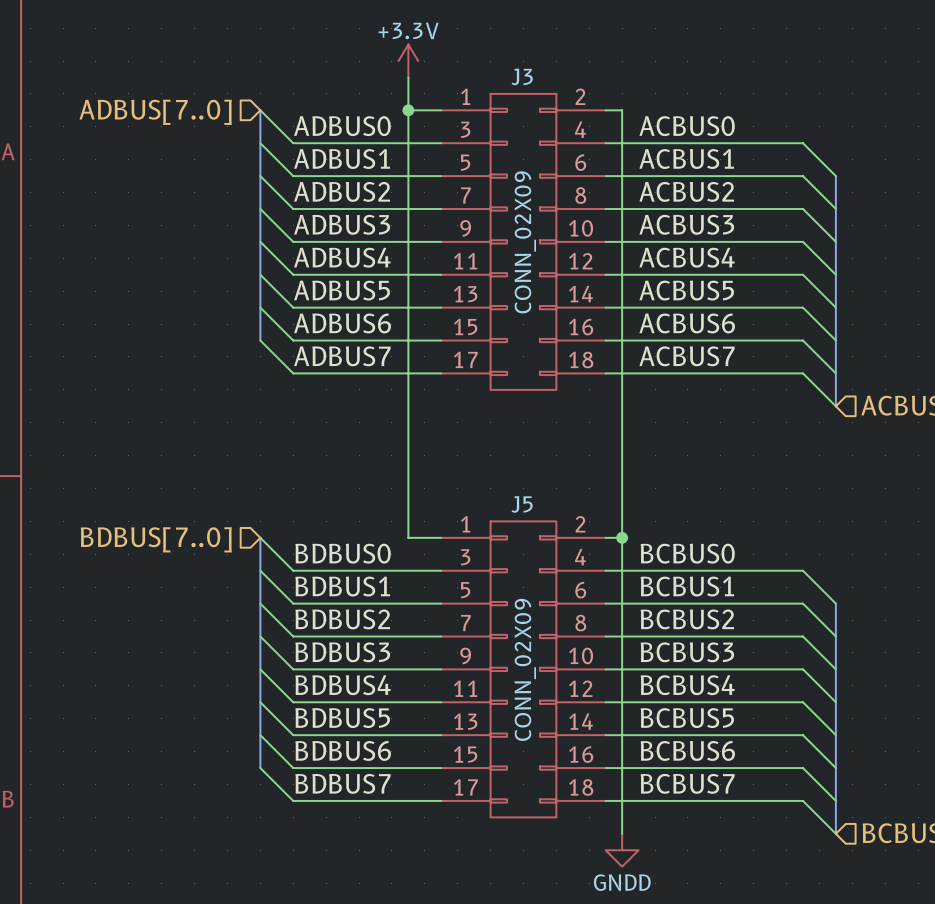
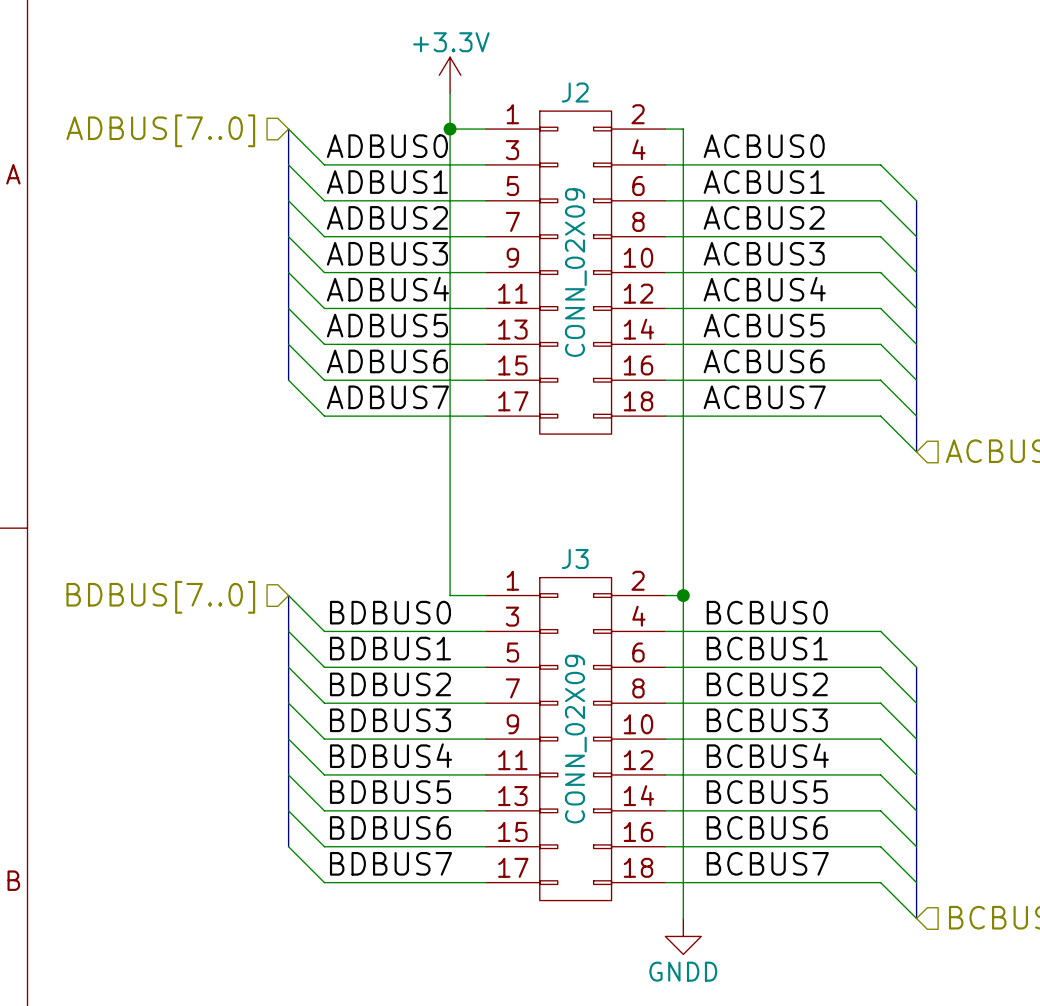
J3 name: J3 (522, 76) -> J2 (575, 92)
J5 name: J5 (522, 504) -> J3 (575, 558)

